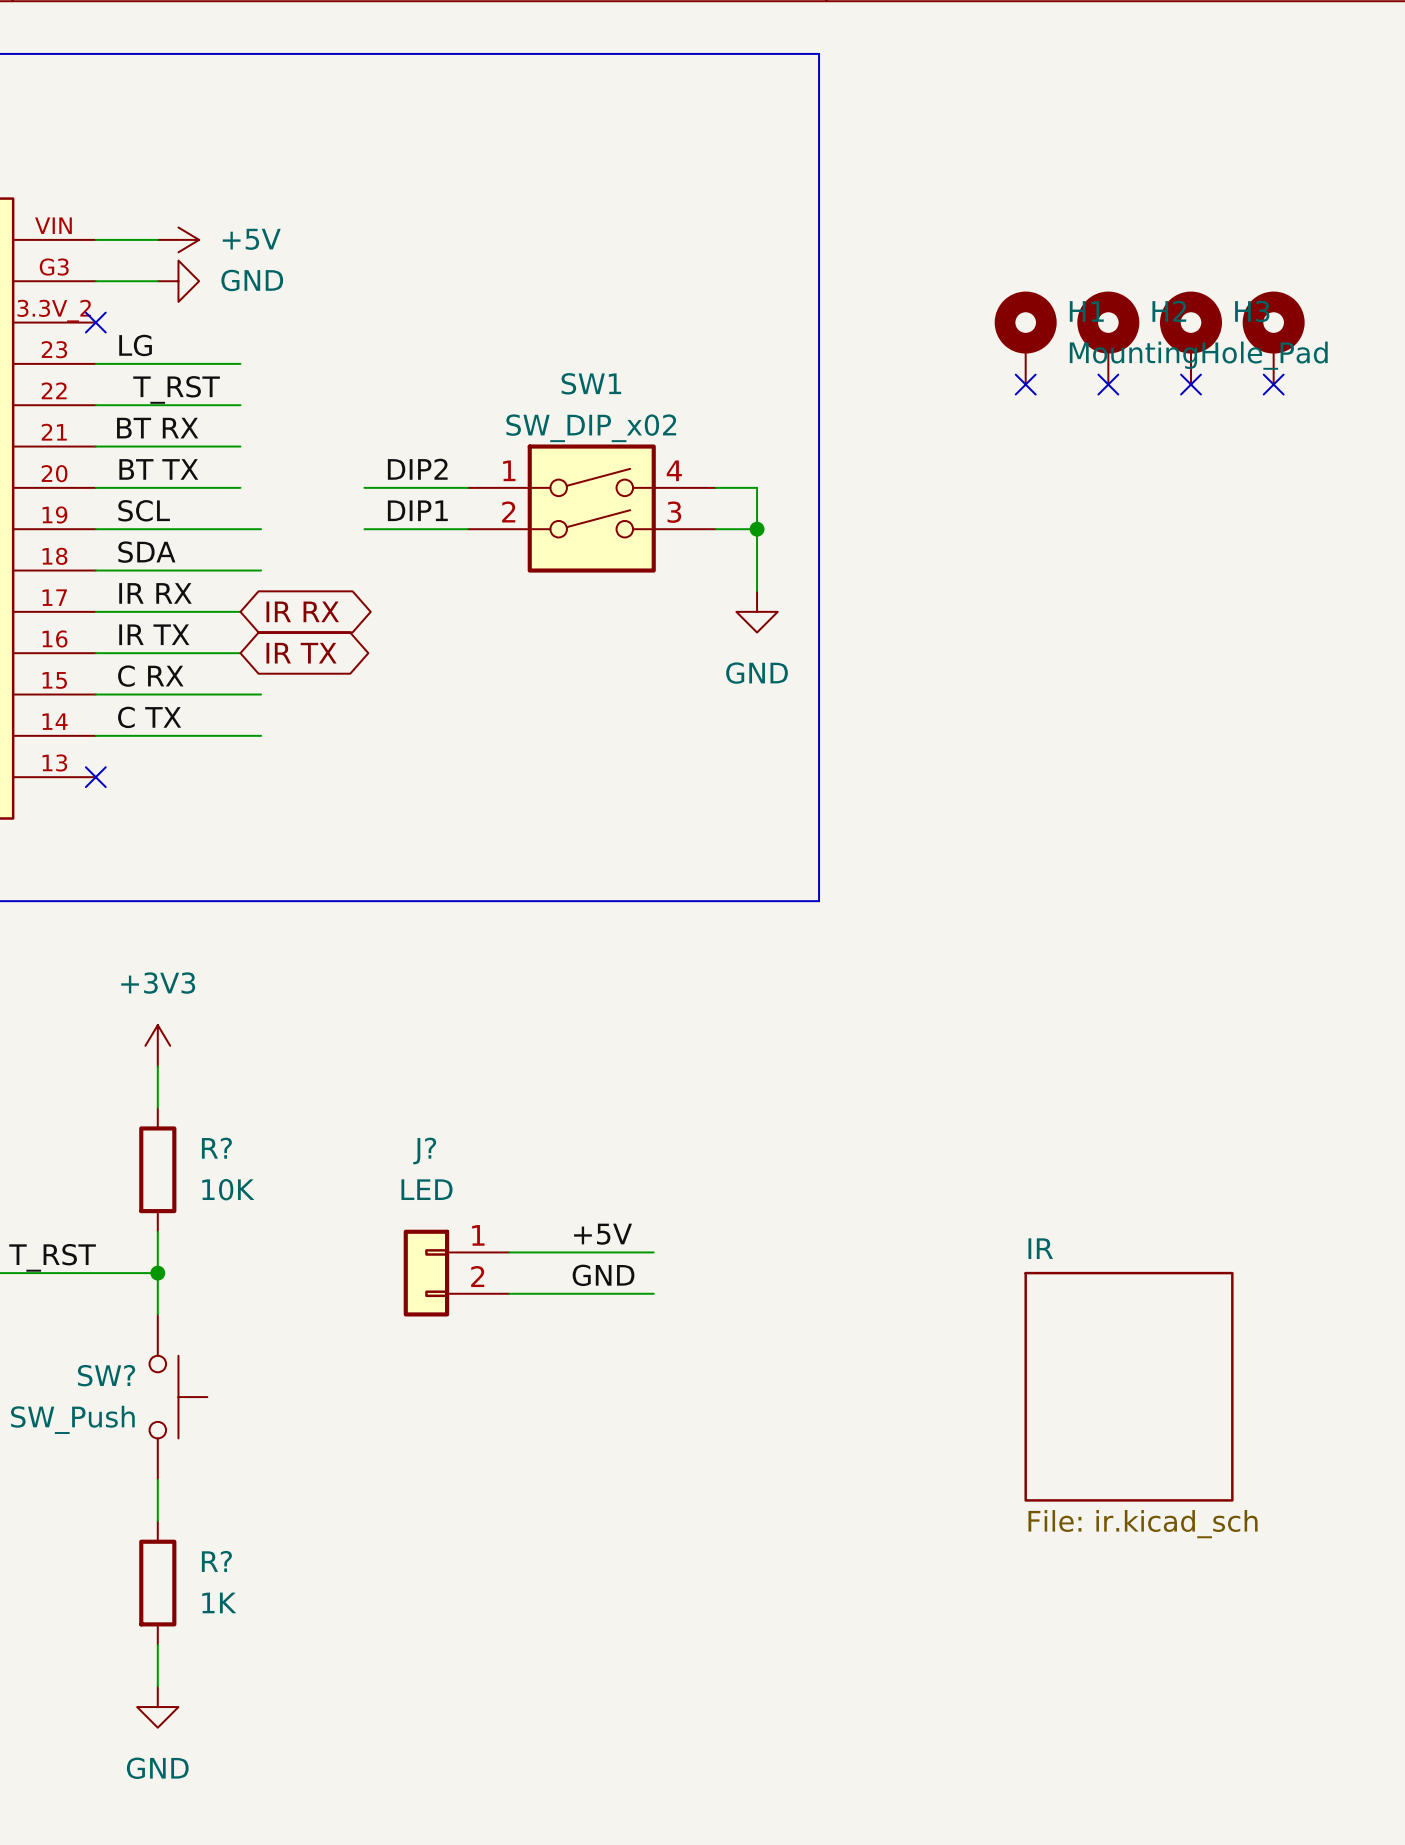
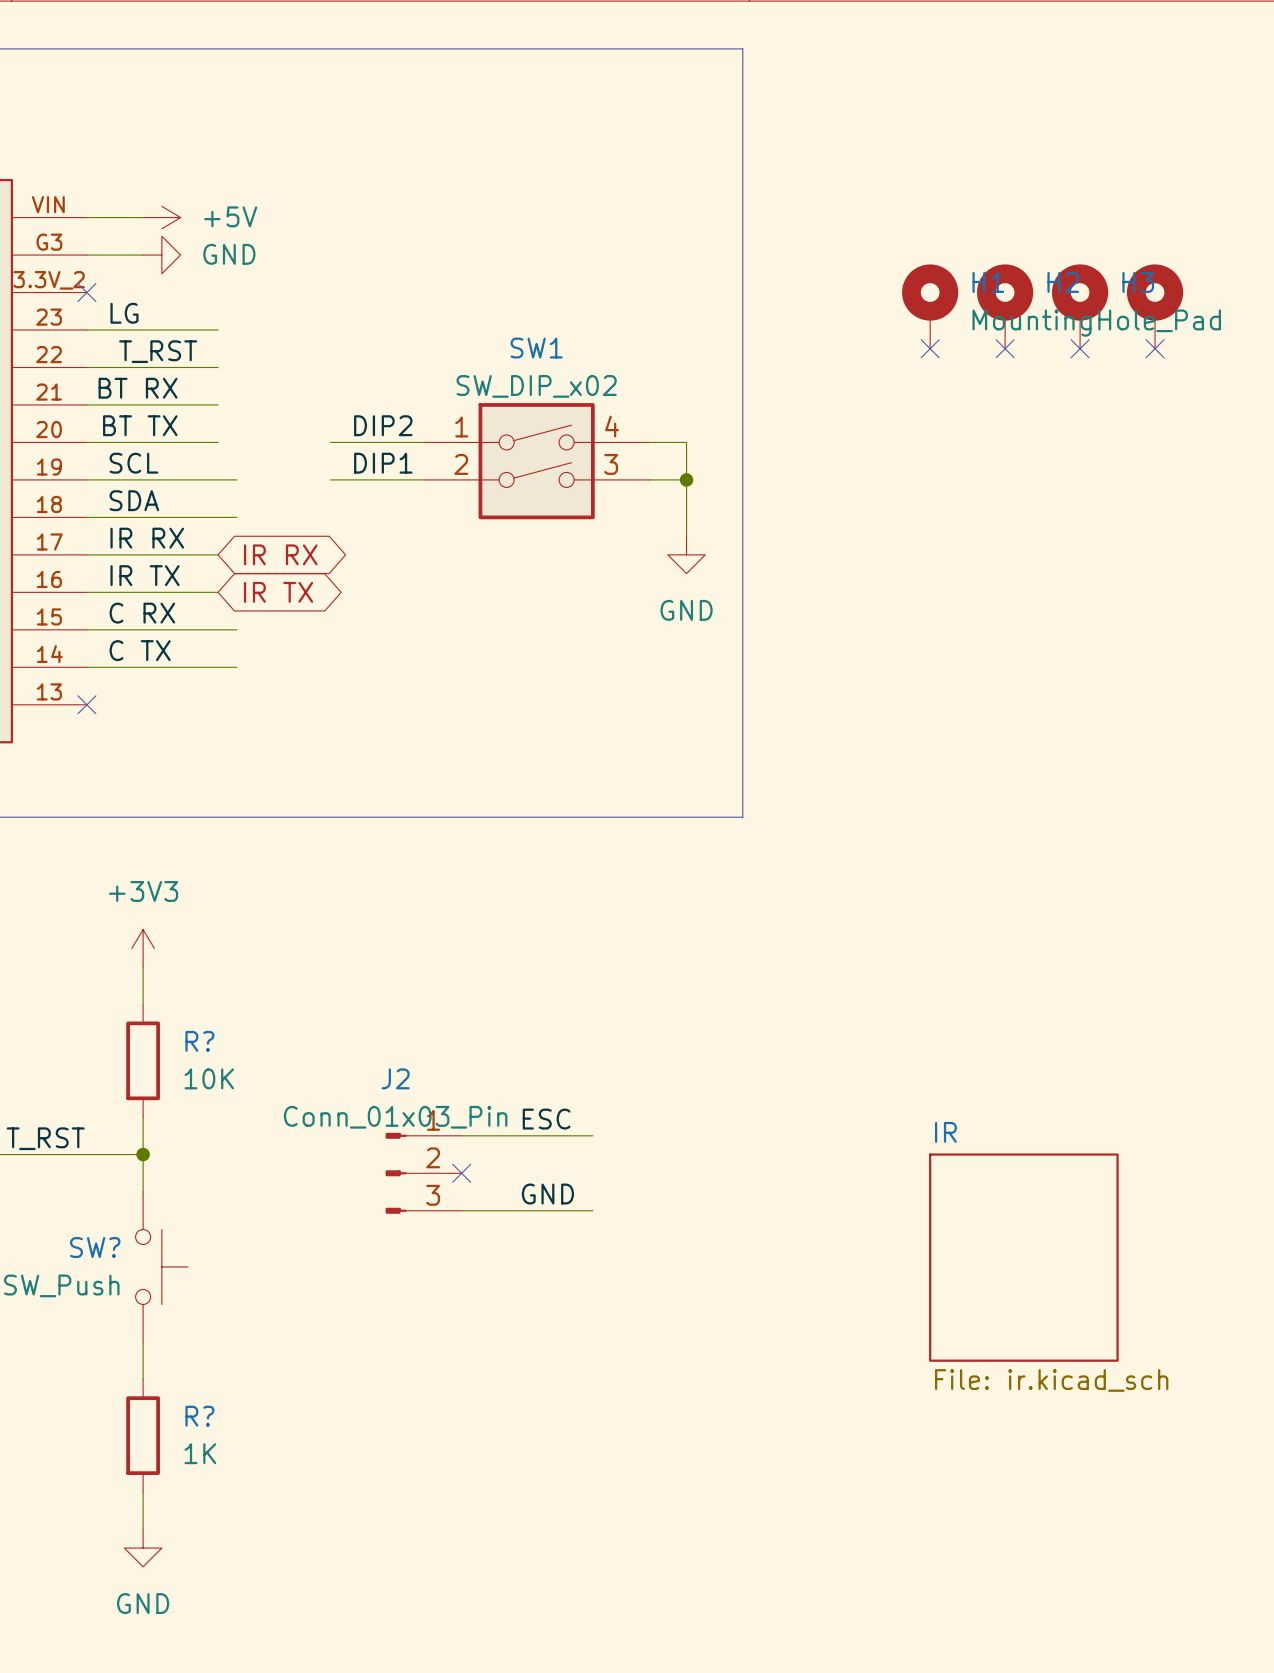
label: +5V (603, 1234) -> ESC (546, 1119)
J?: LED (456, 1273) -> none
label position: GND (603, 1275) -> GND (547, 1194)
J2: none -> Conn_01x03_Pin (423, 1173)
wire: (509, 1293) (653, 1293) -> (461, 1210) (592, 1210)
no-connect mark: none -> (461, 1173)

